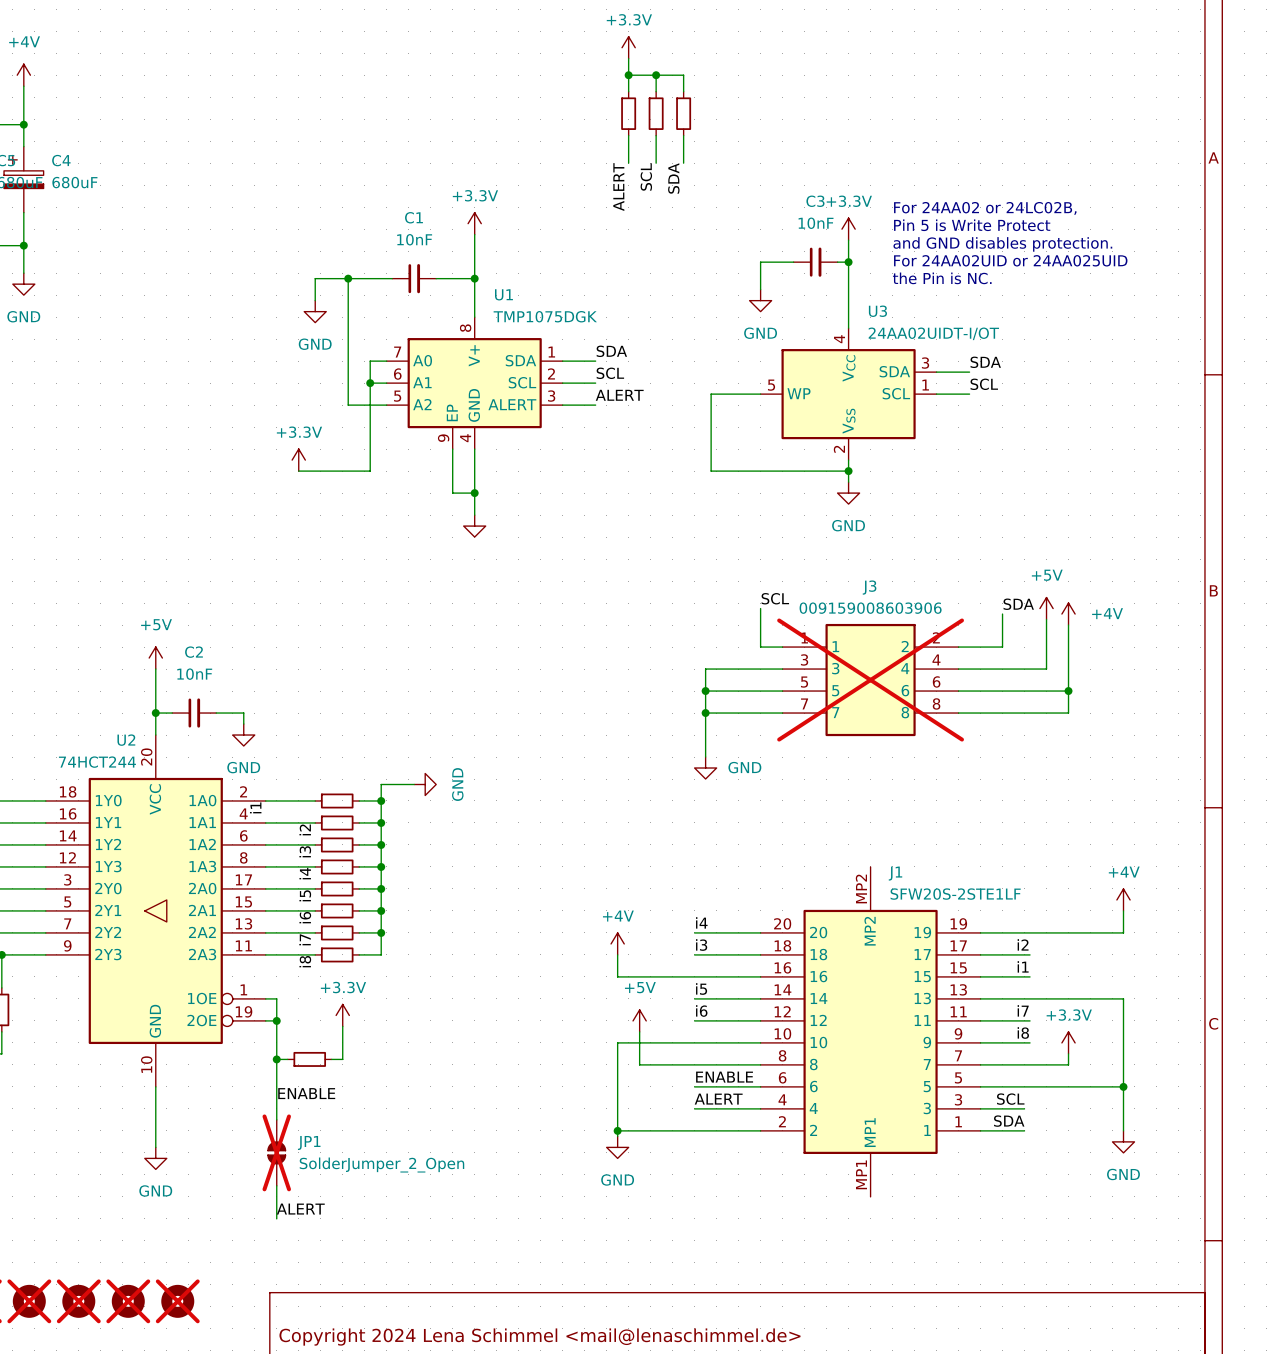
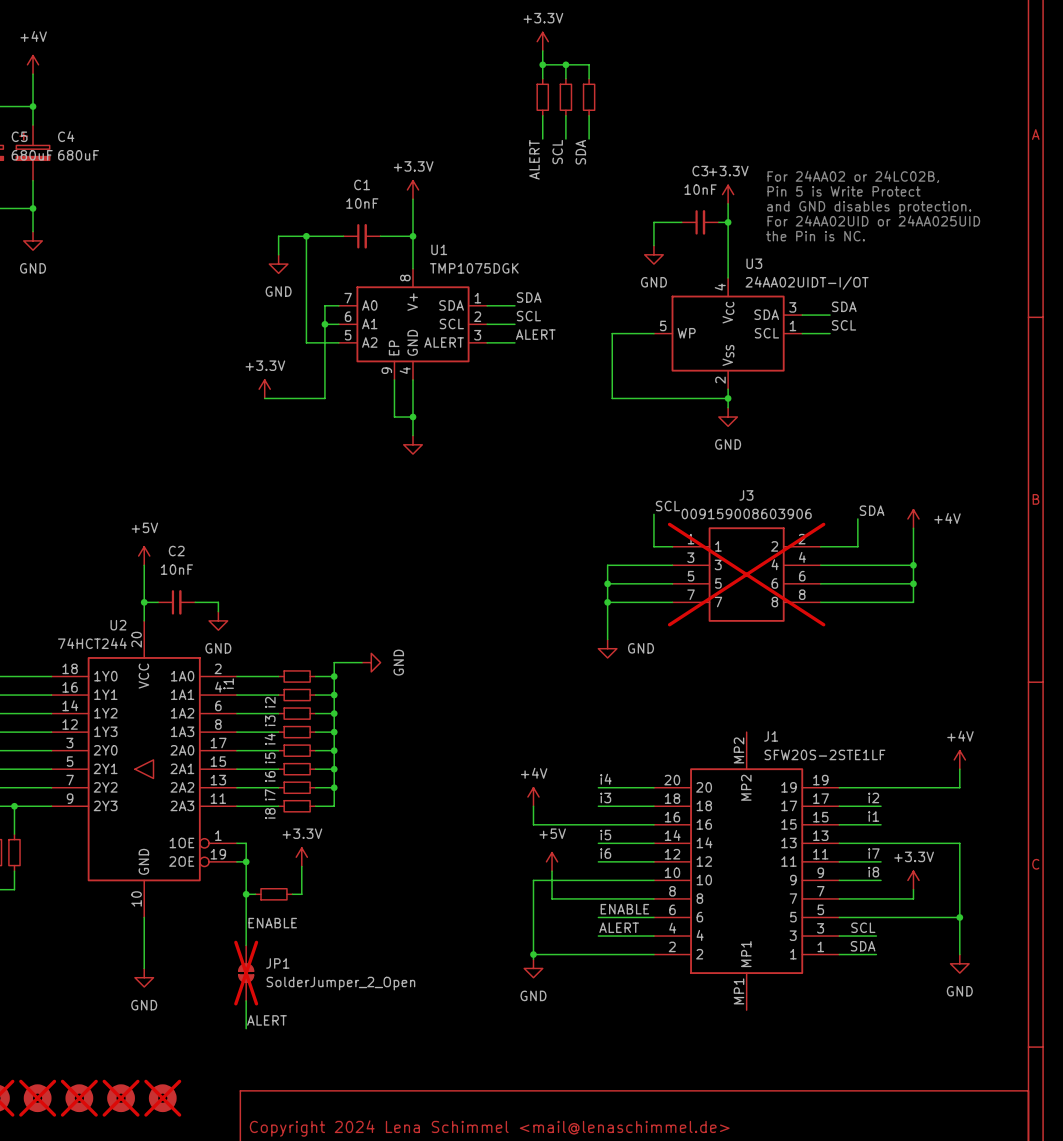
power symbol: +5V (1046, 608) -> none
wire: (1046, 619) (1046, 669) -> (913, 565) (894, 565)
junction: none -> (913, 565)

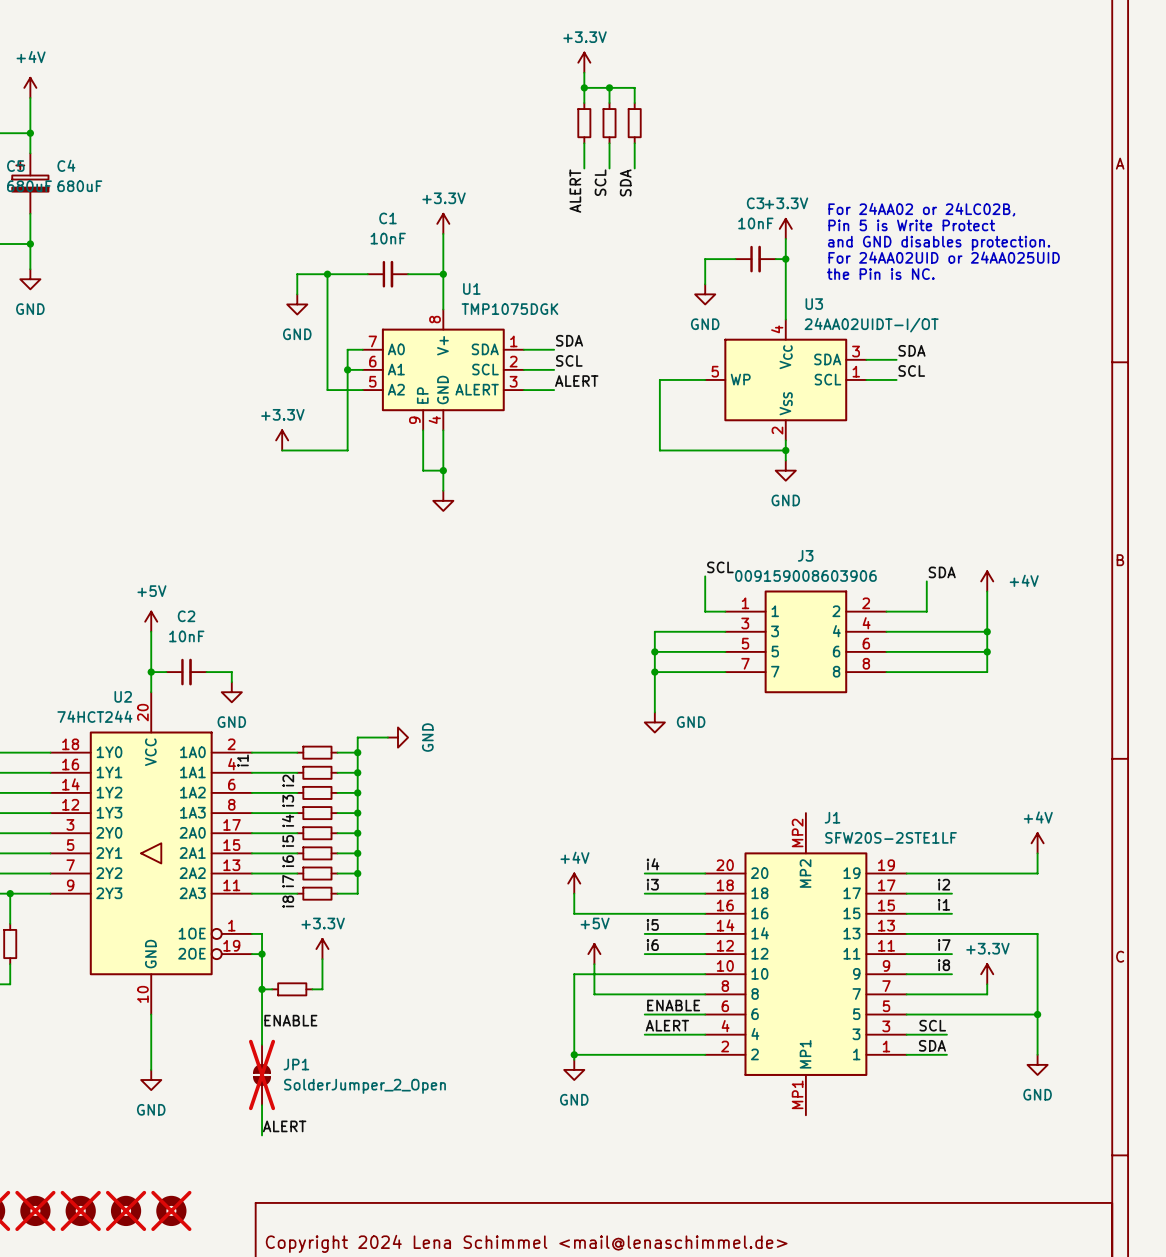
J3 do-not-place cross: (746, 574) -> none

